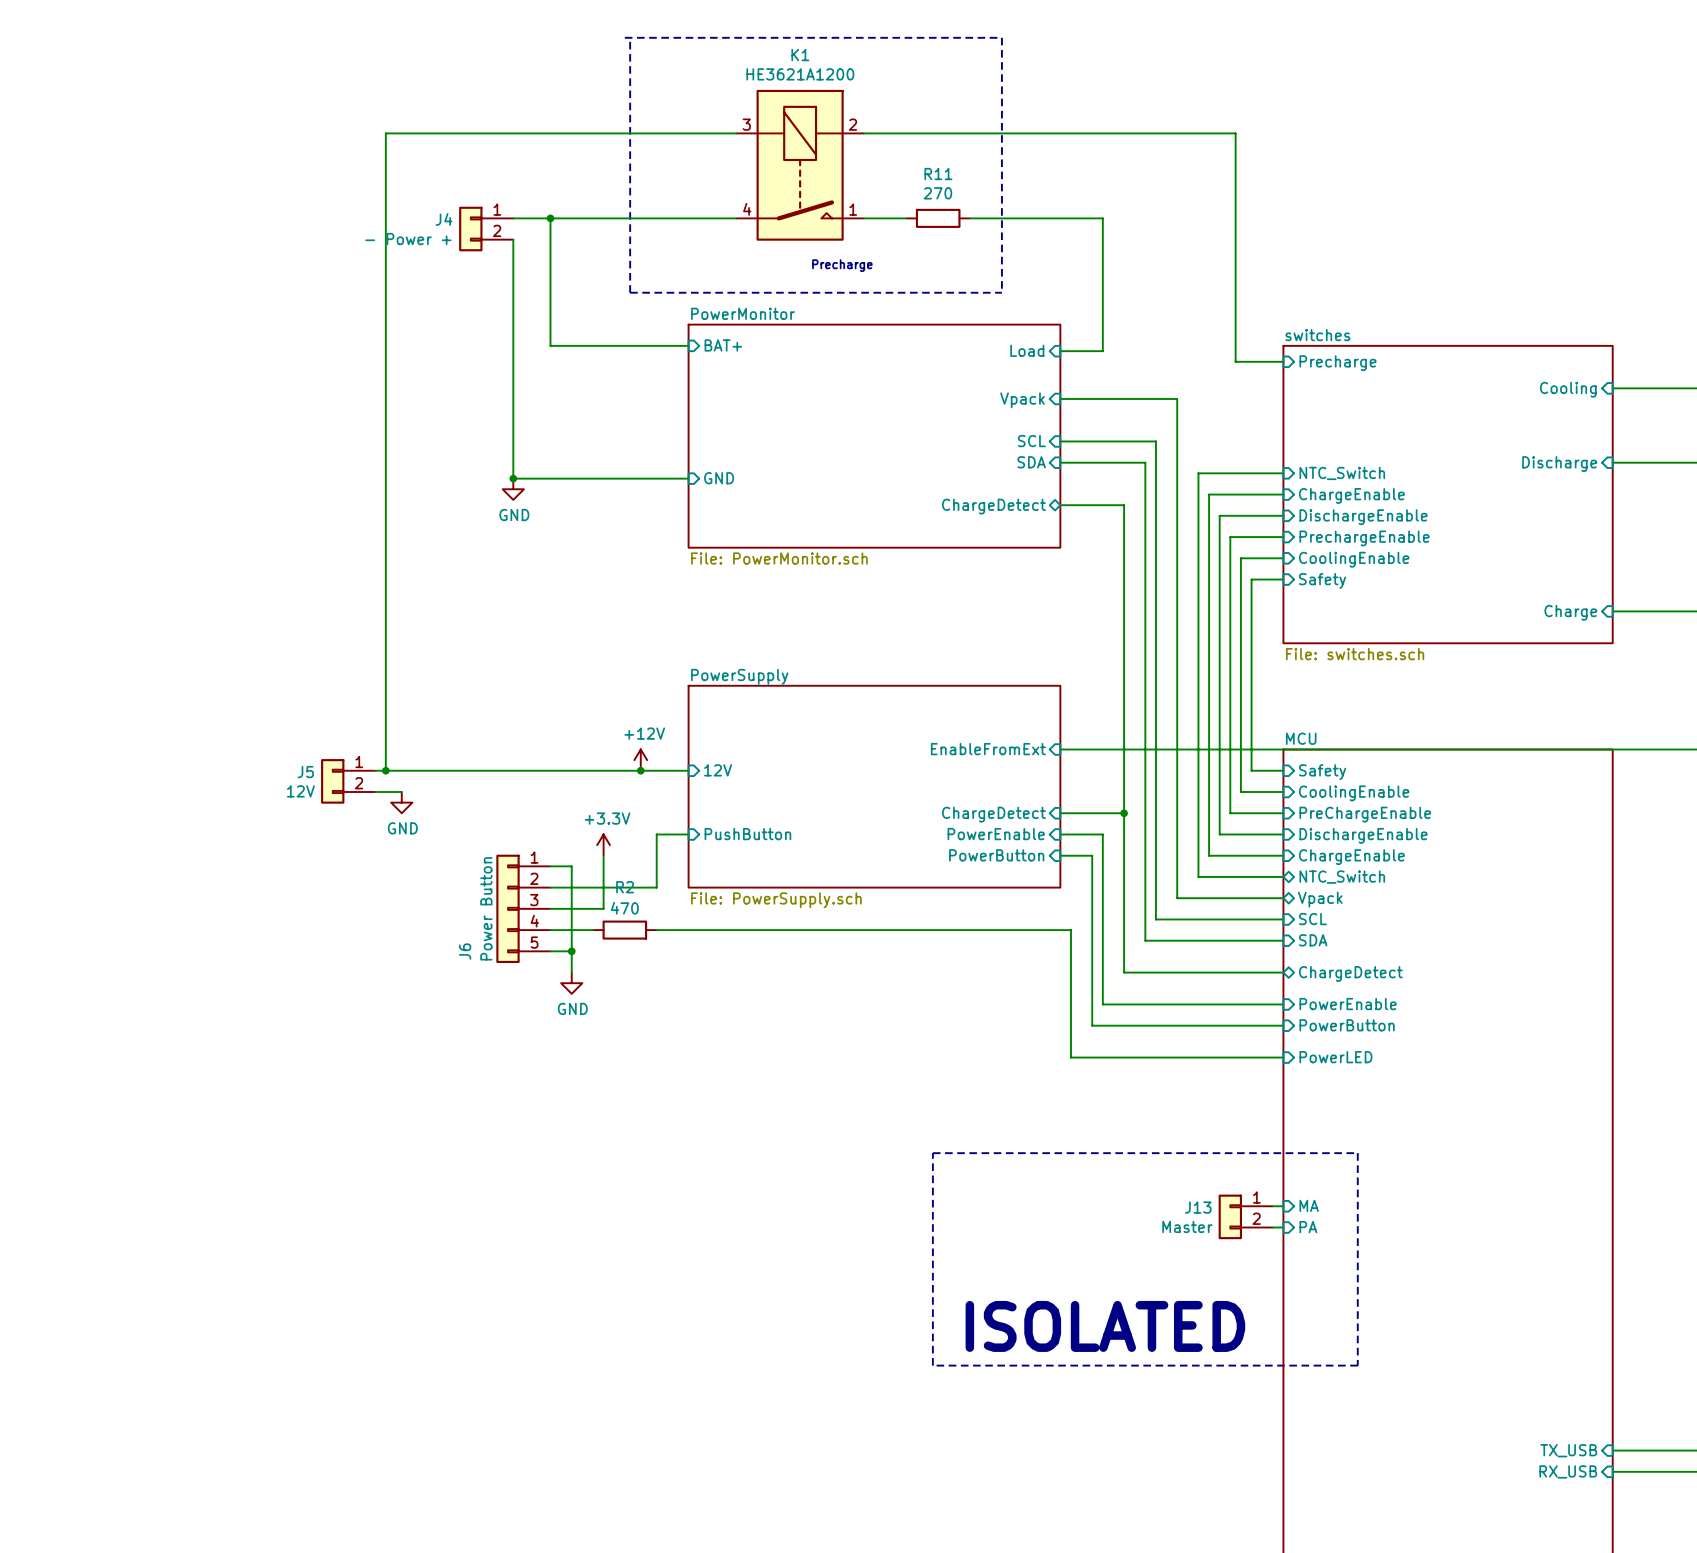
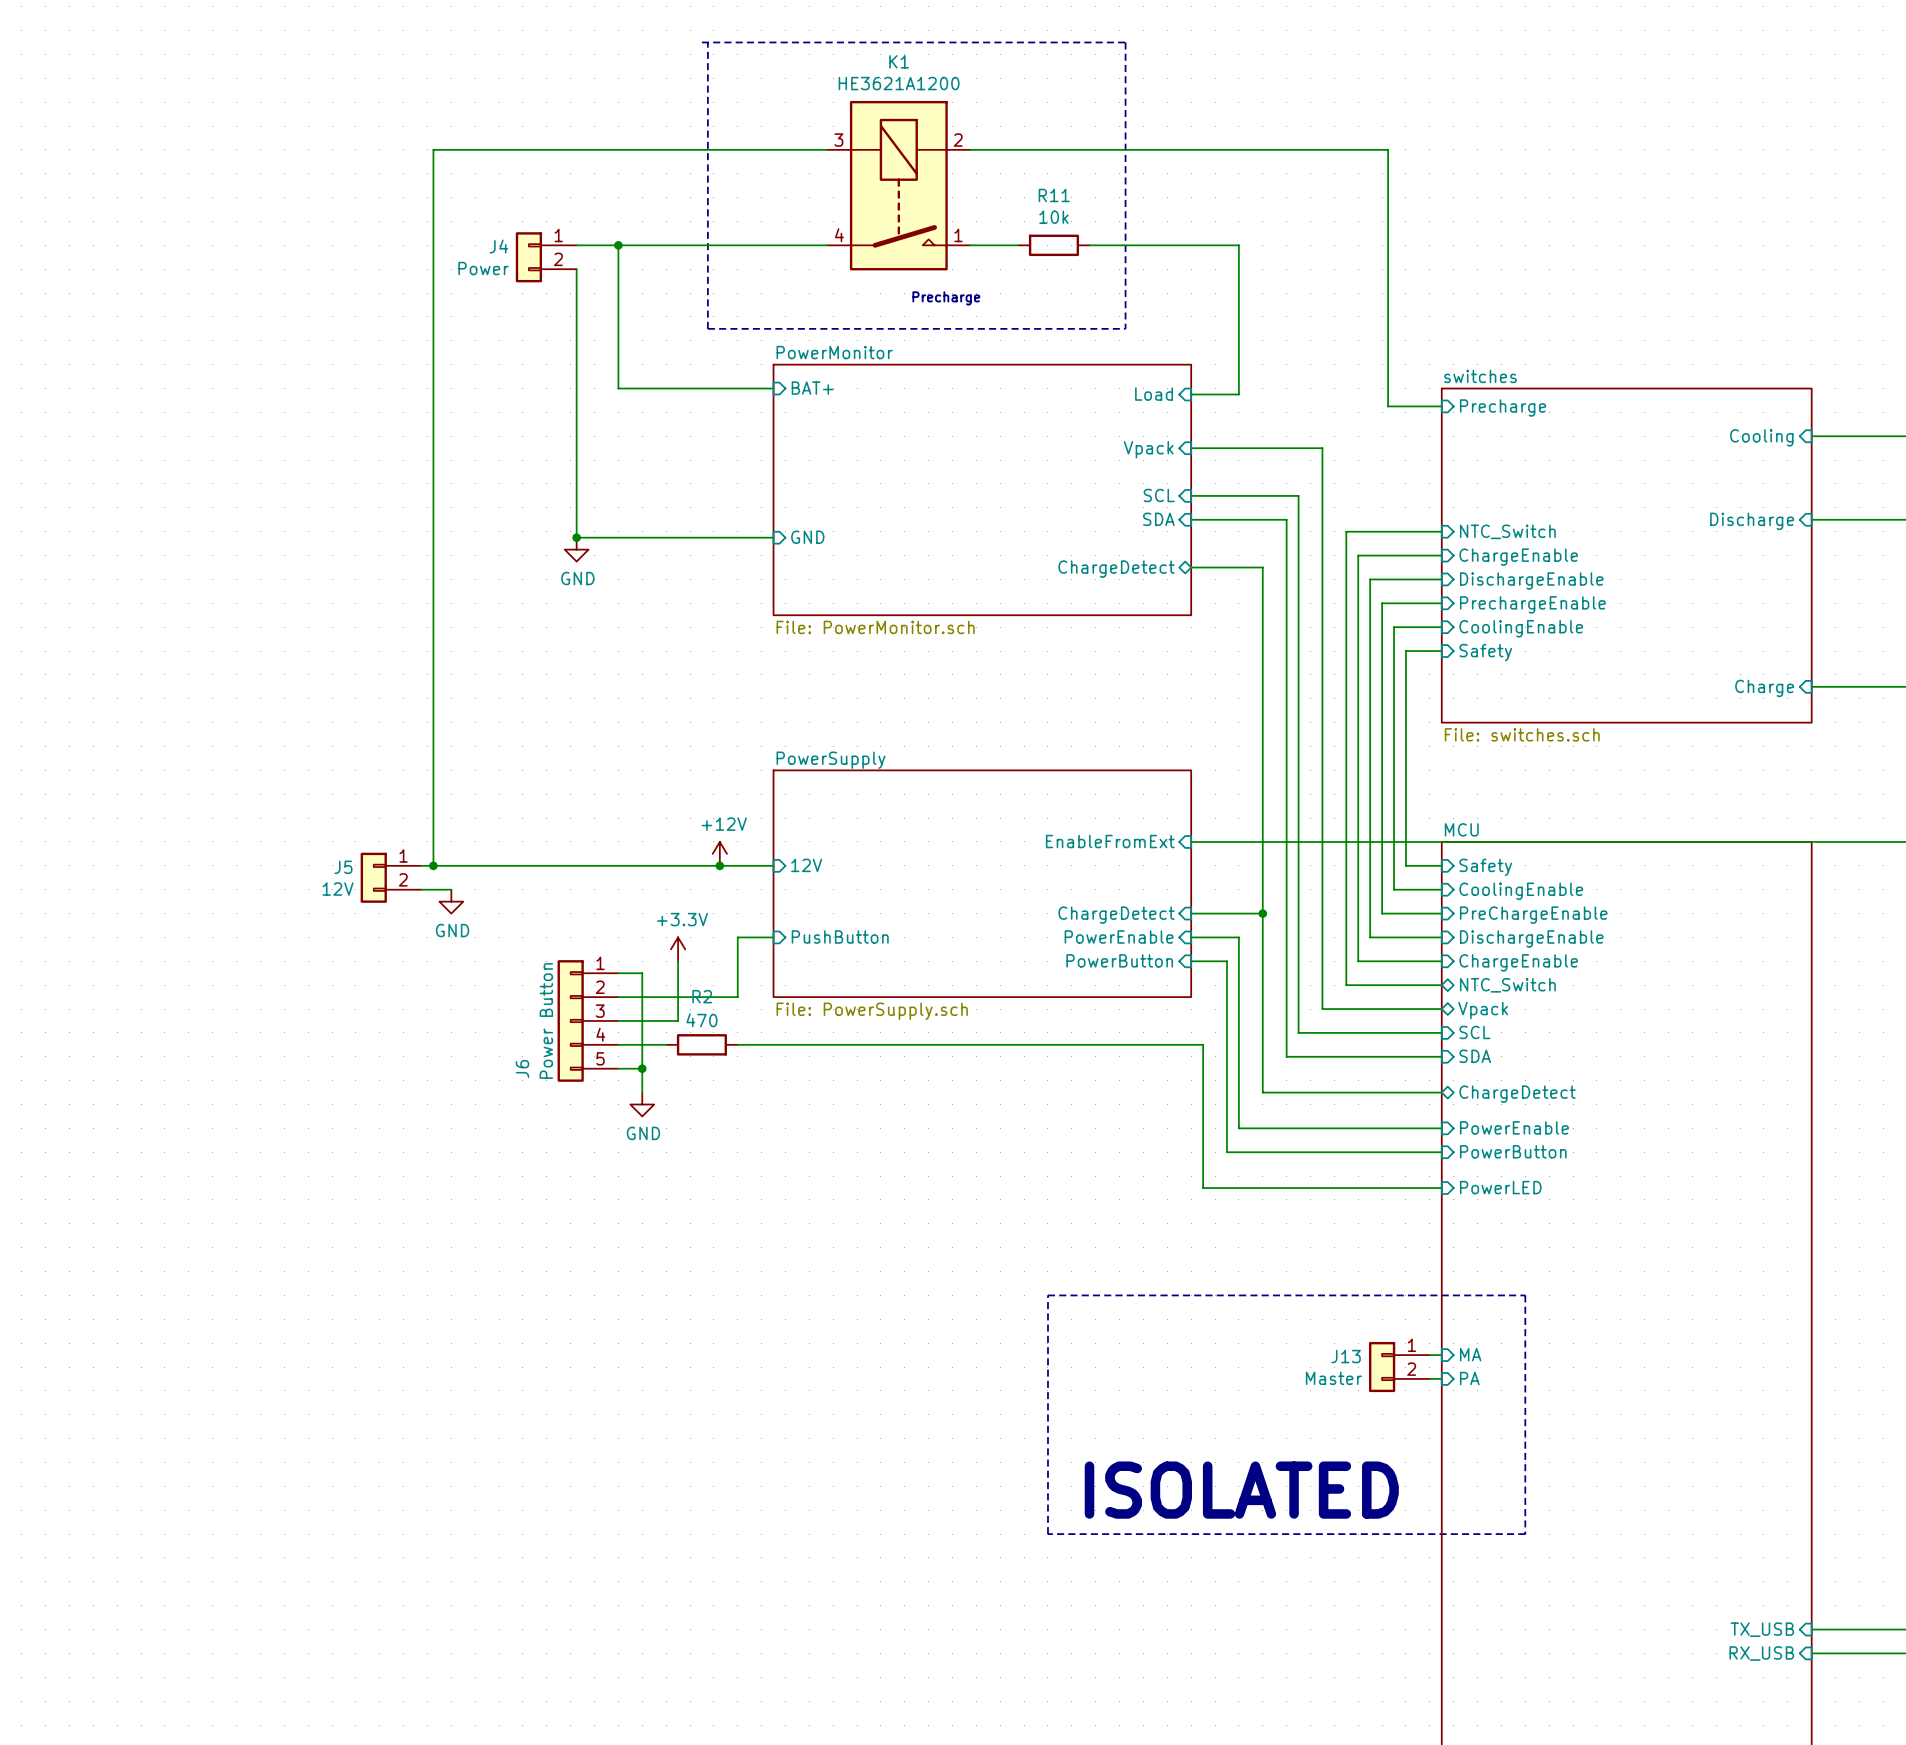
R11 value: 270 (937, 193) -> 10k (1053, 217)
J4 value: - Power + (408, 239) -> Power (483, 268)

